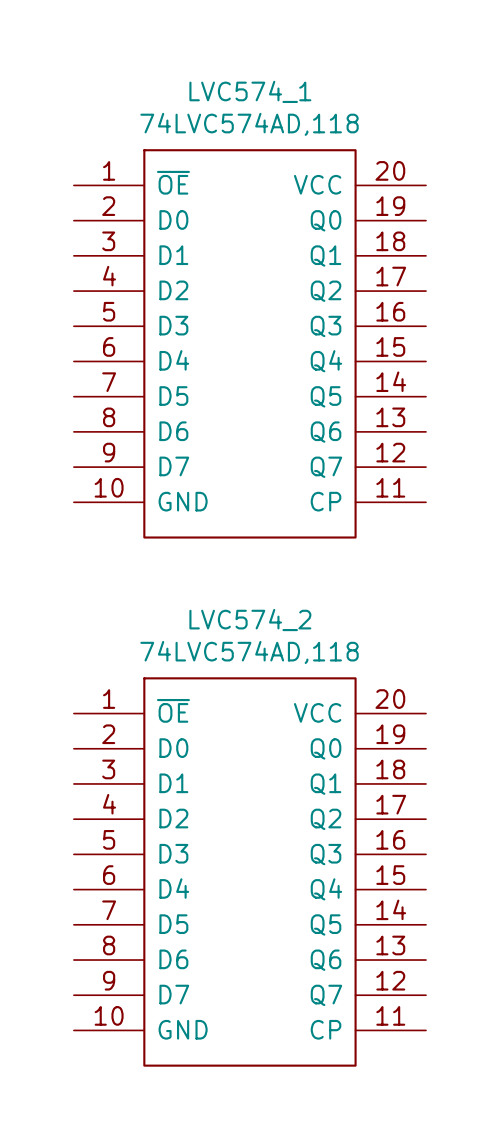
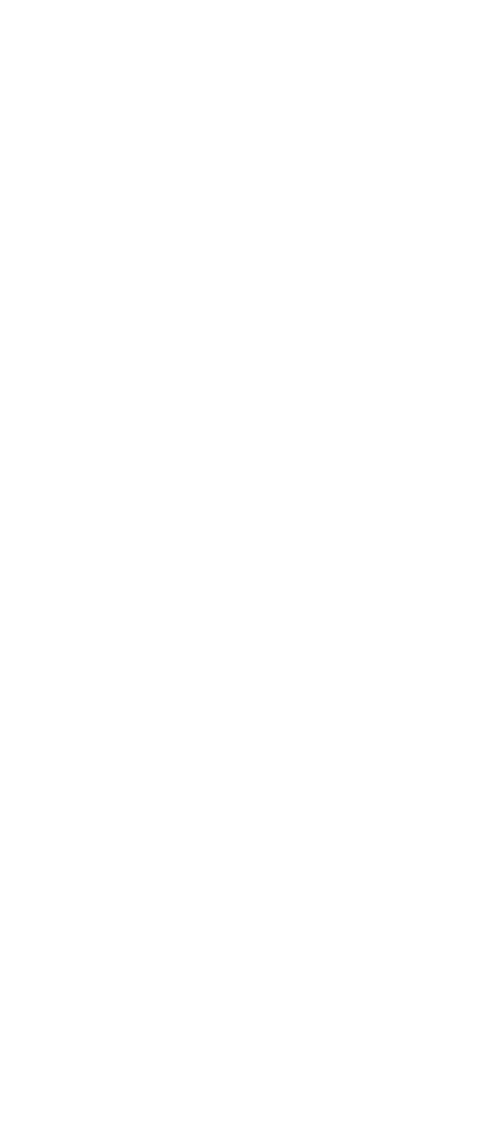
LVC574_1: 74LVC574AD,118 (249, 343) -> none
LVC574_2: 74LVC574AD,118 (249, 871) -> none

